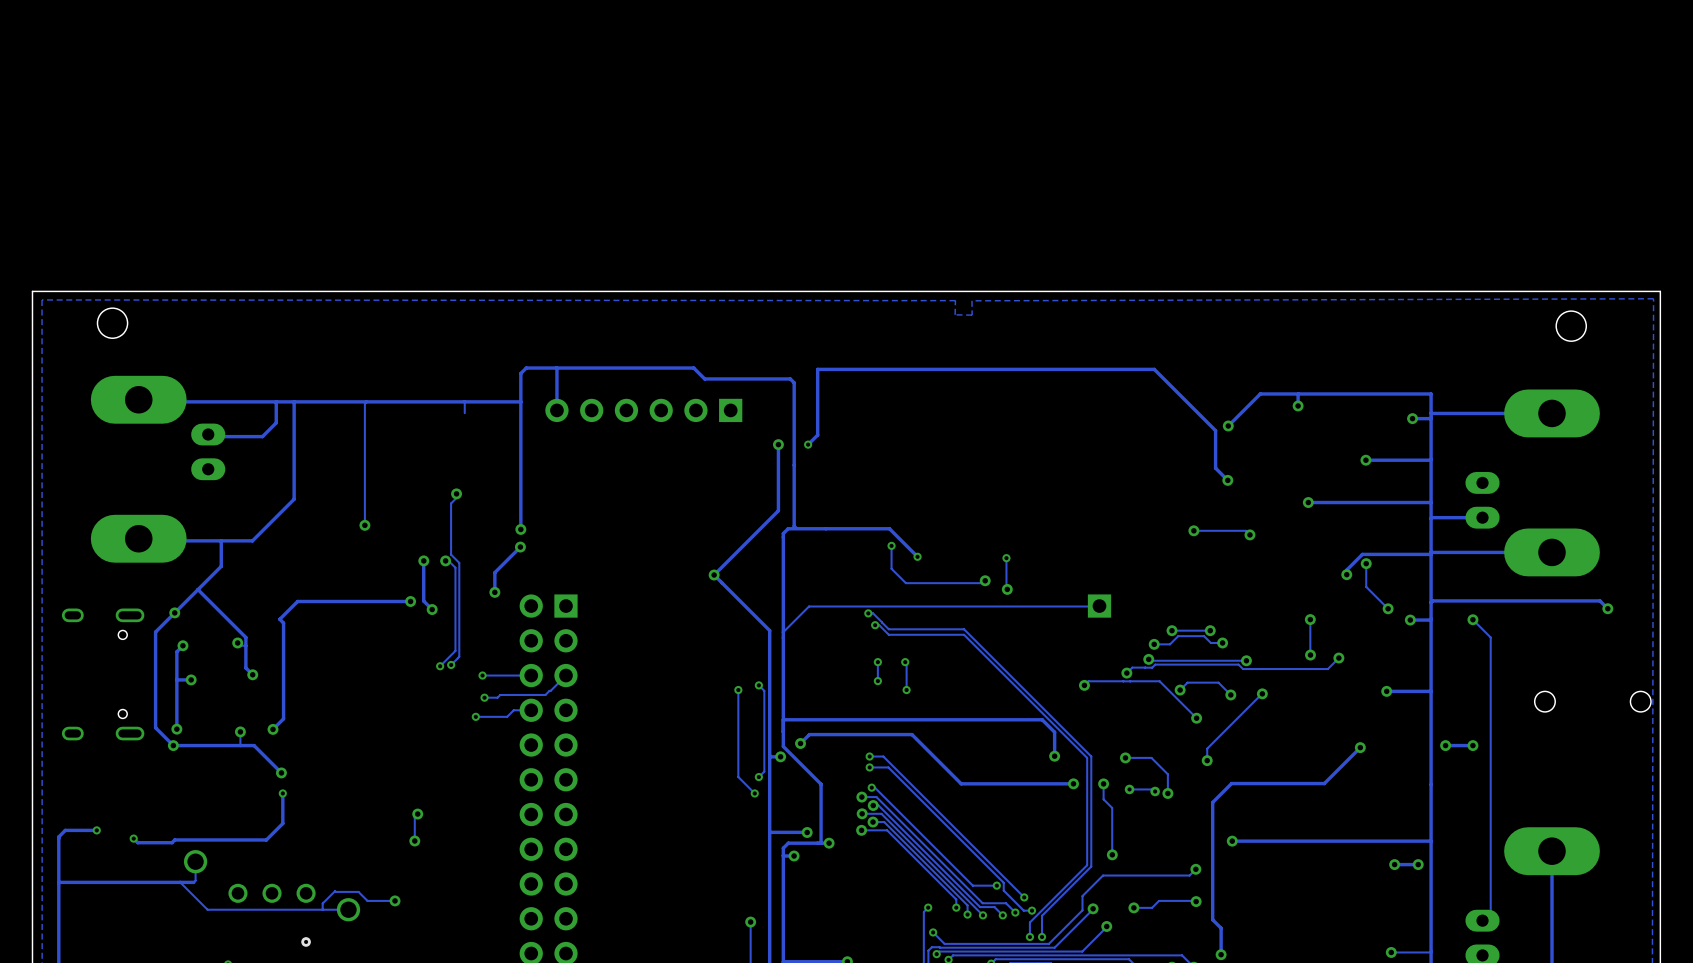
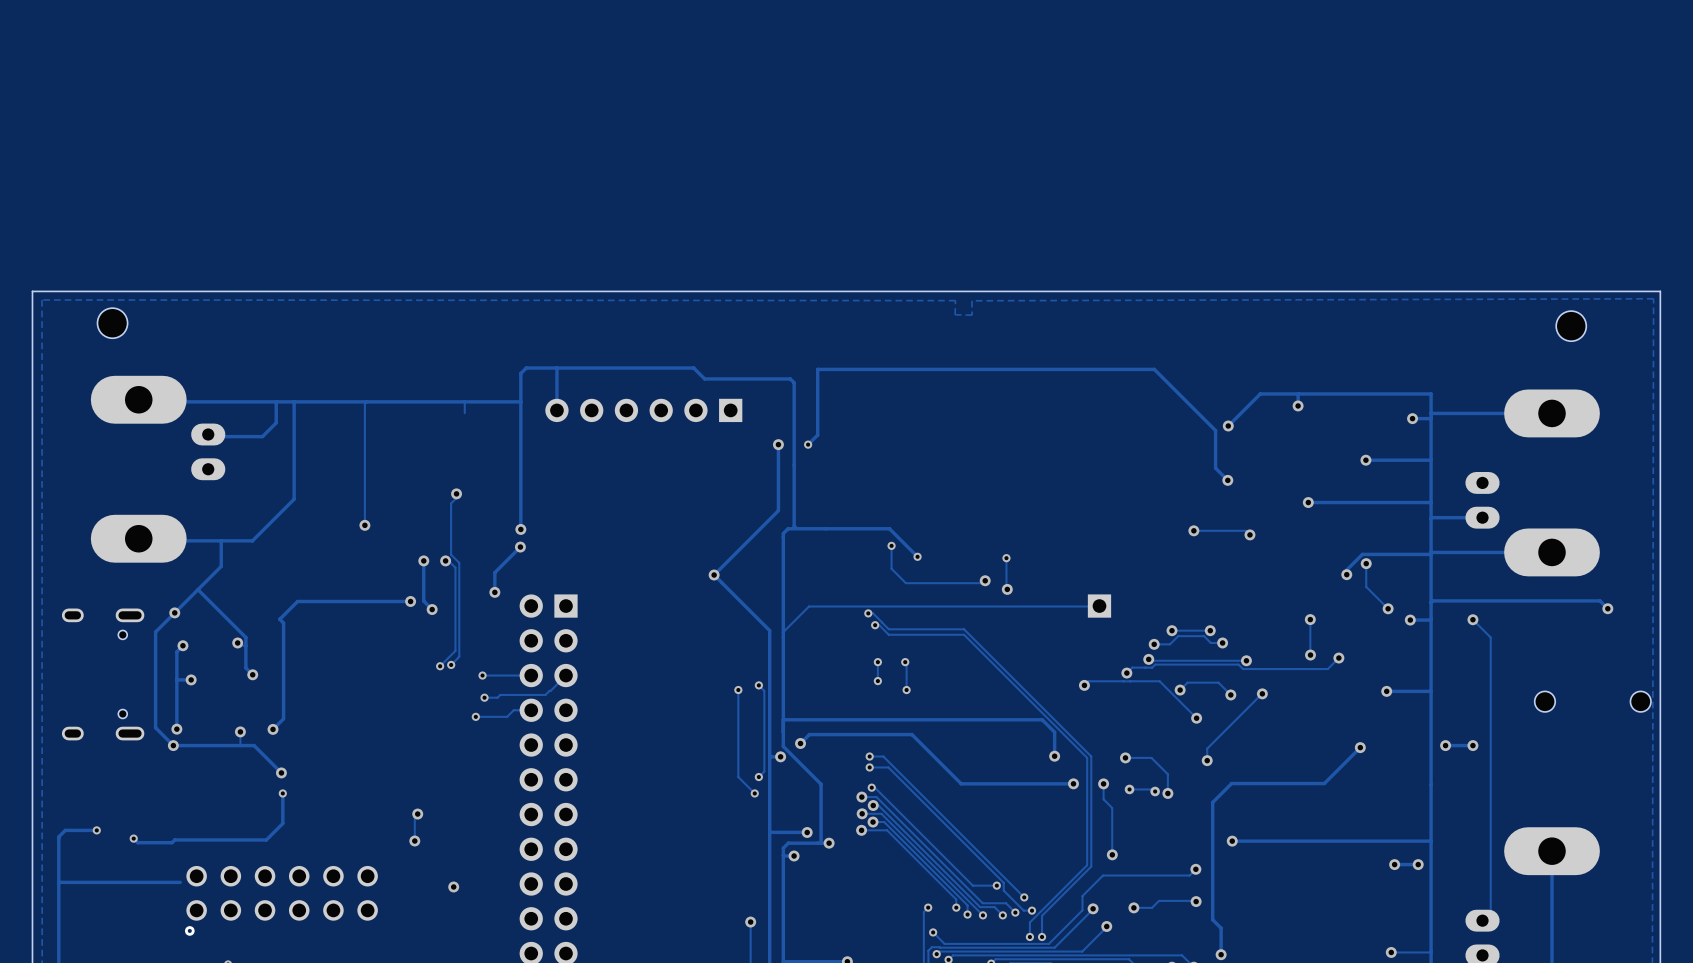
part footprint: [183, 850, 361, 947] -> [184, 865, 378, 936]
track: (195, 861) (195, 880) (180, 882) (207, 909) (348, 909) -> none
track: (395, 900) (367, 900) (358, 891) (335, 891) (322, 903) (322, 909) -> none
via position: (395, 900) -> (453, 886)

